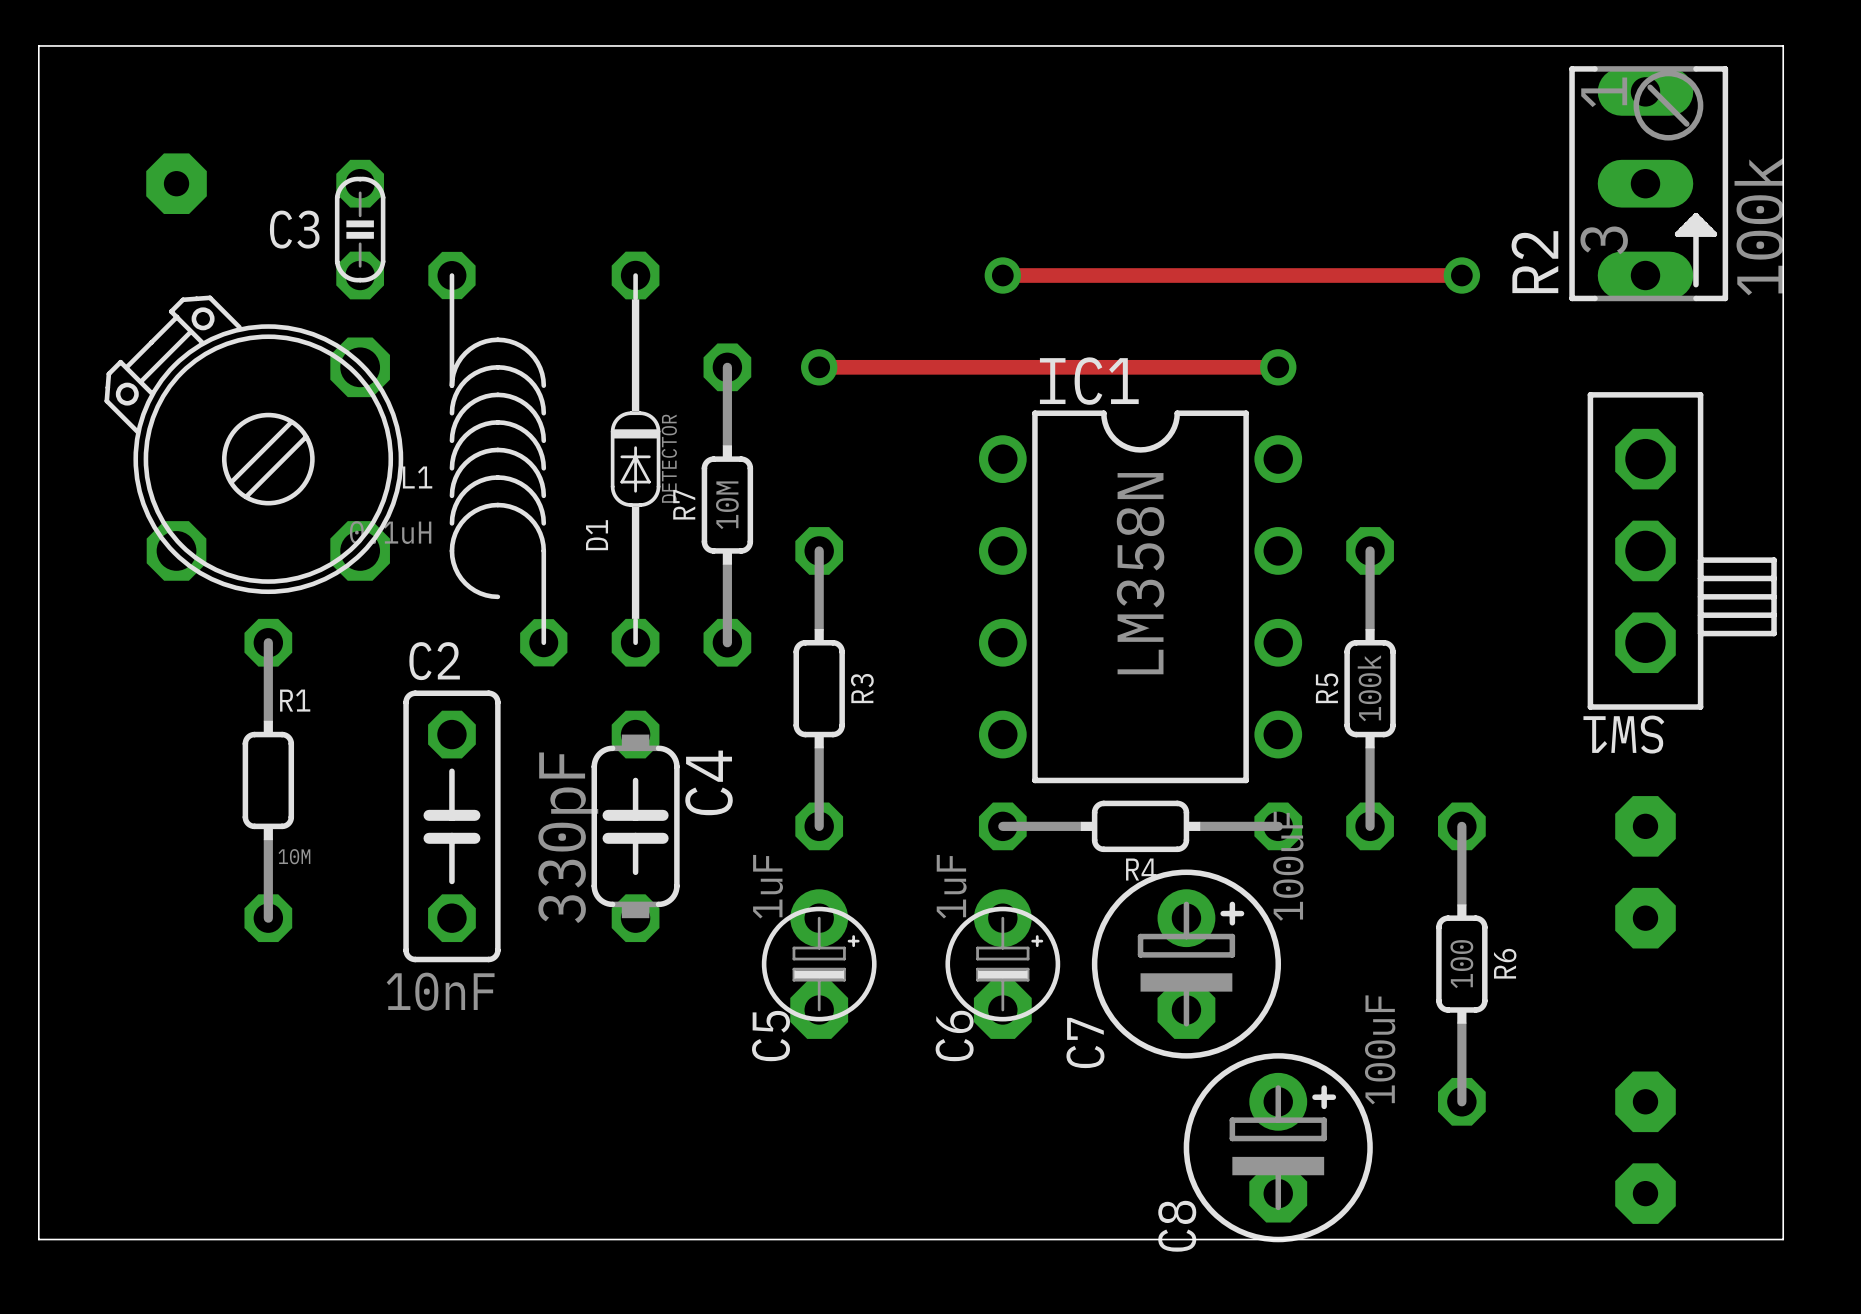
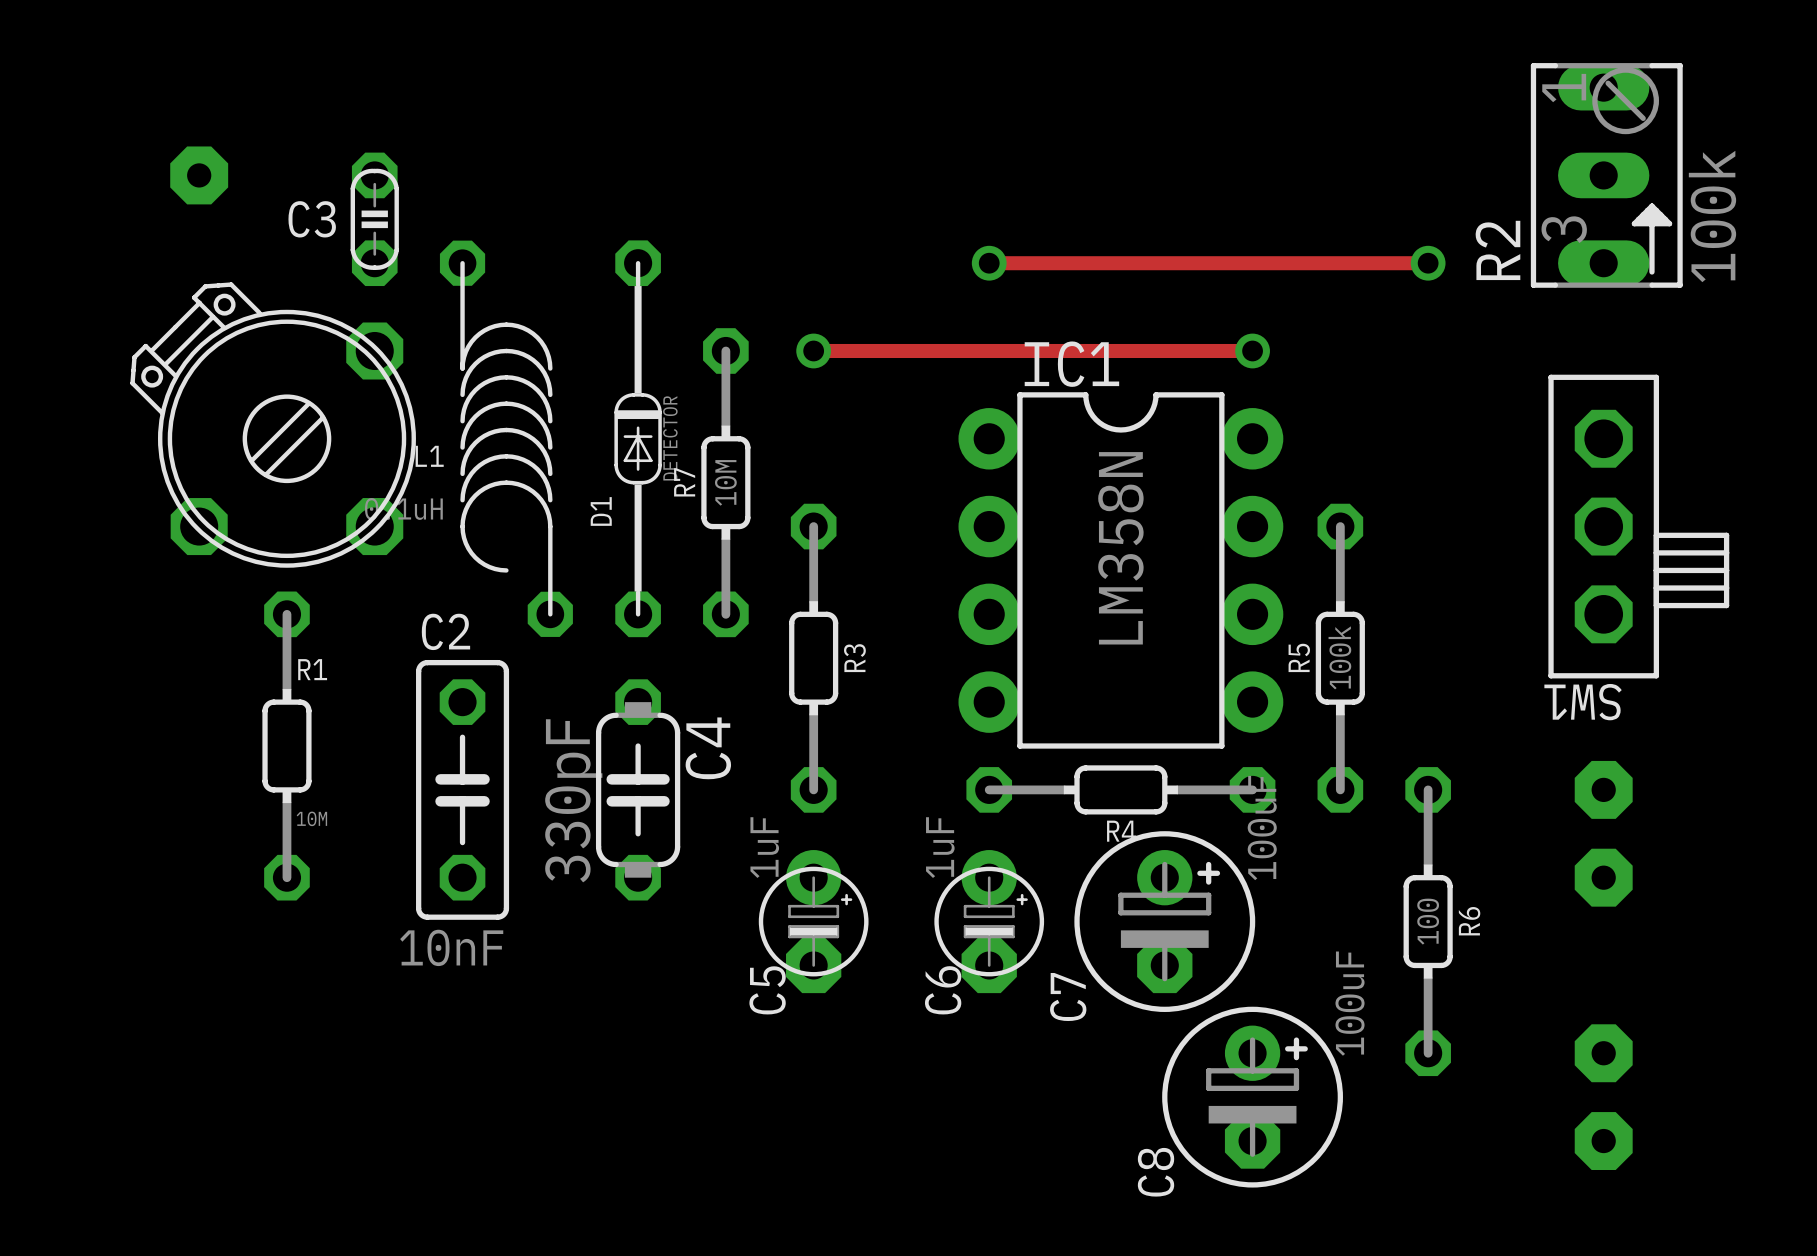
board edge: (38, 45) (1783, 45) (1783, 1239) (38, 1239) (38, 45) -> none
IC1 footprint: [978, 410, 1303, 784] -> [958, 392, 1284, 749]

